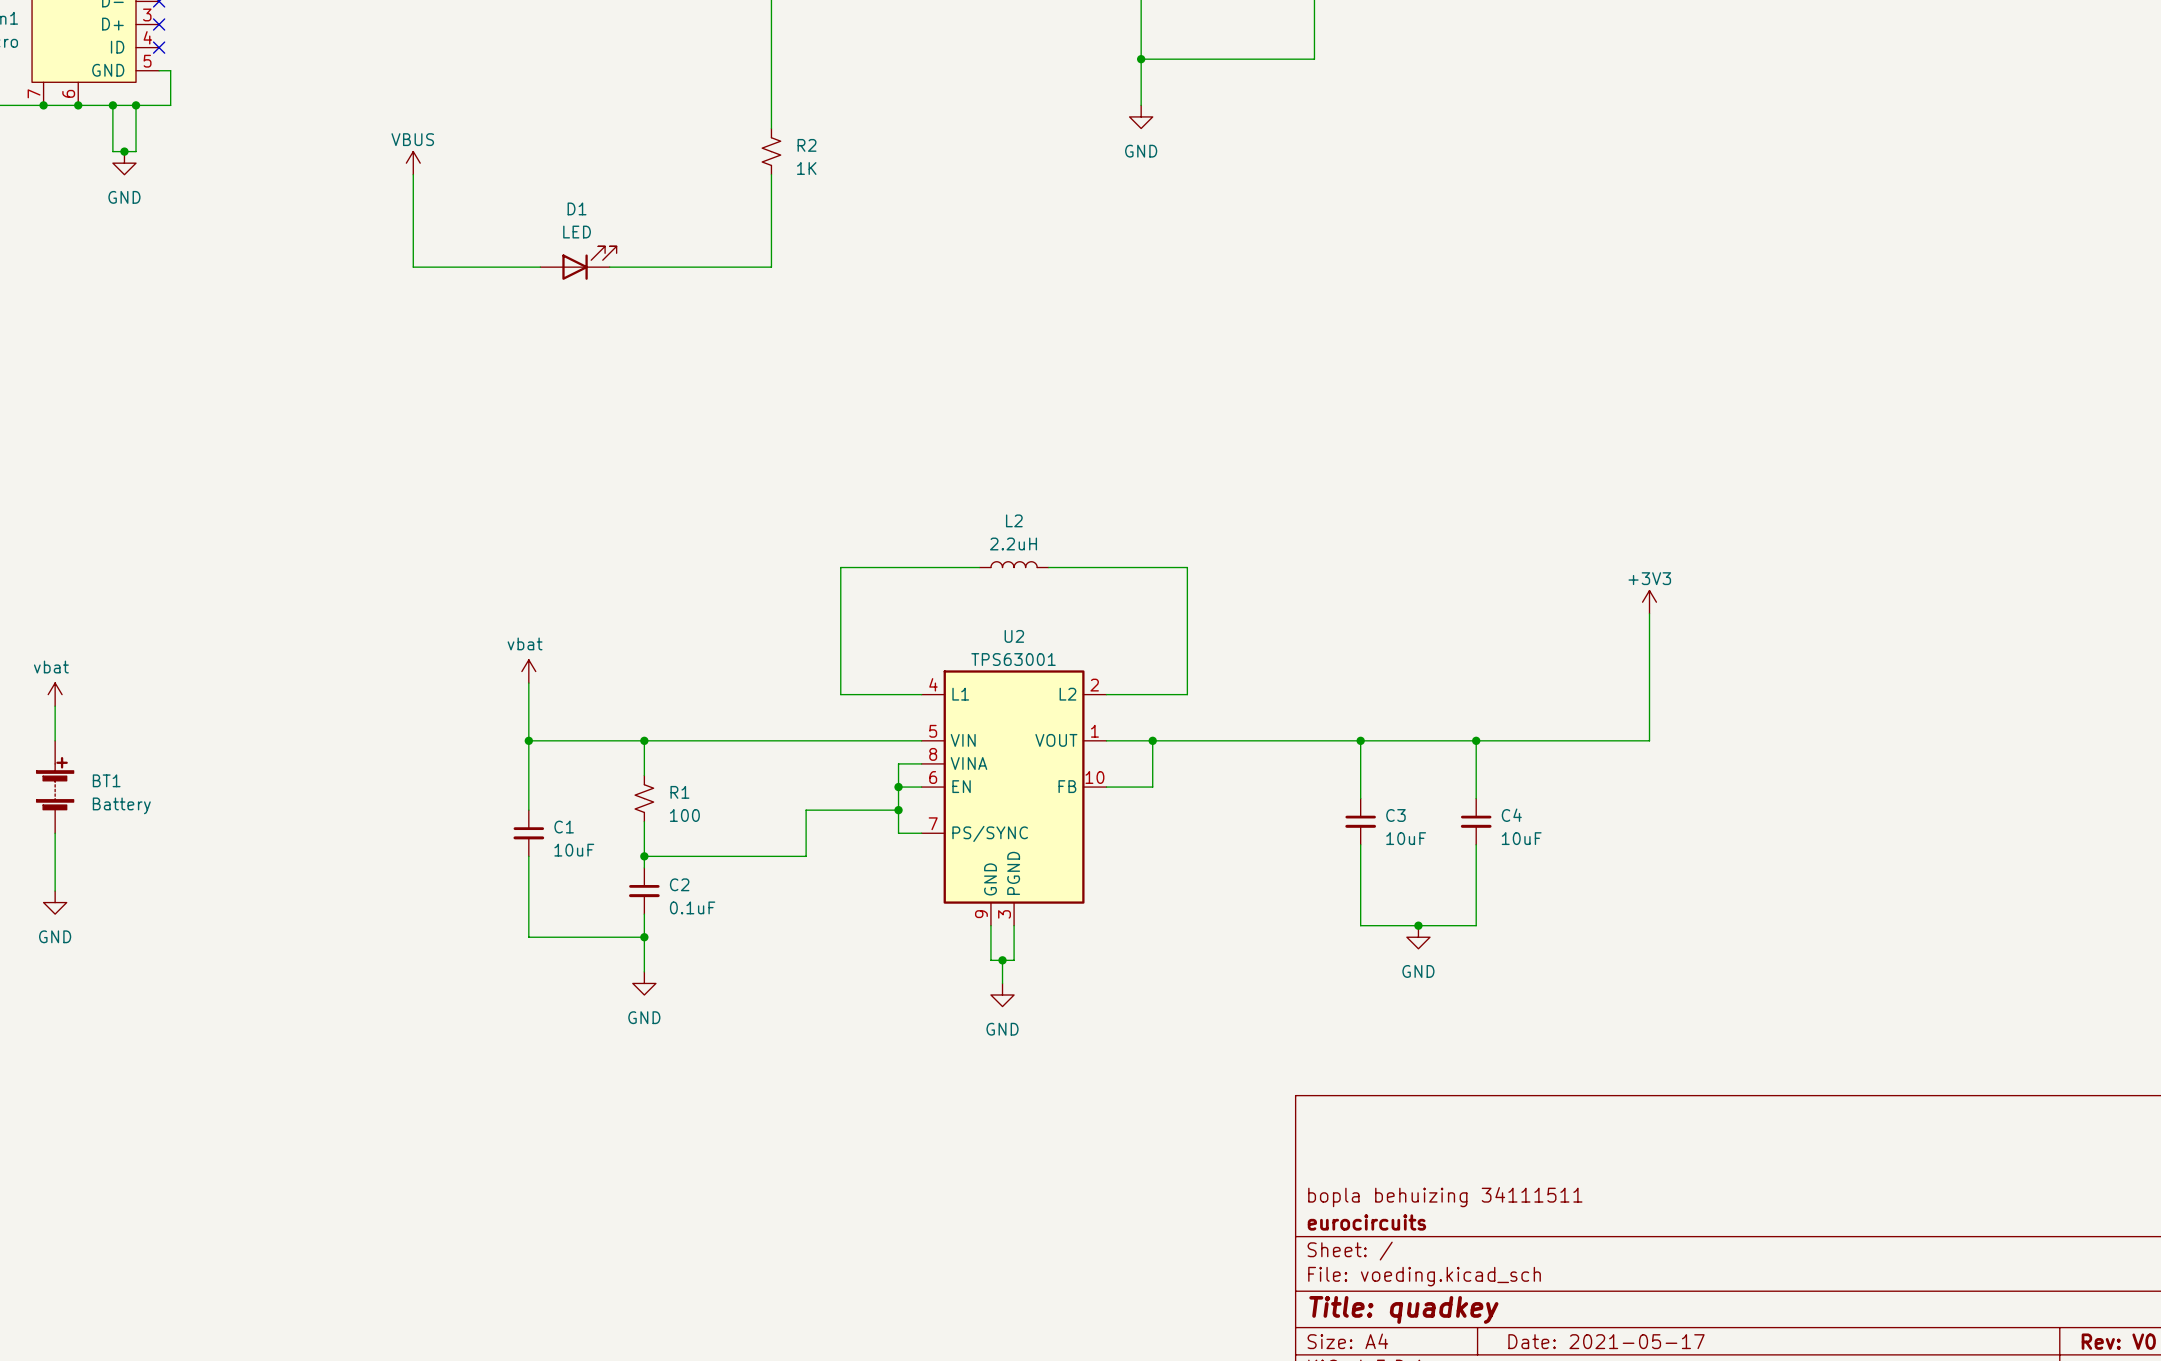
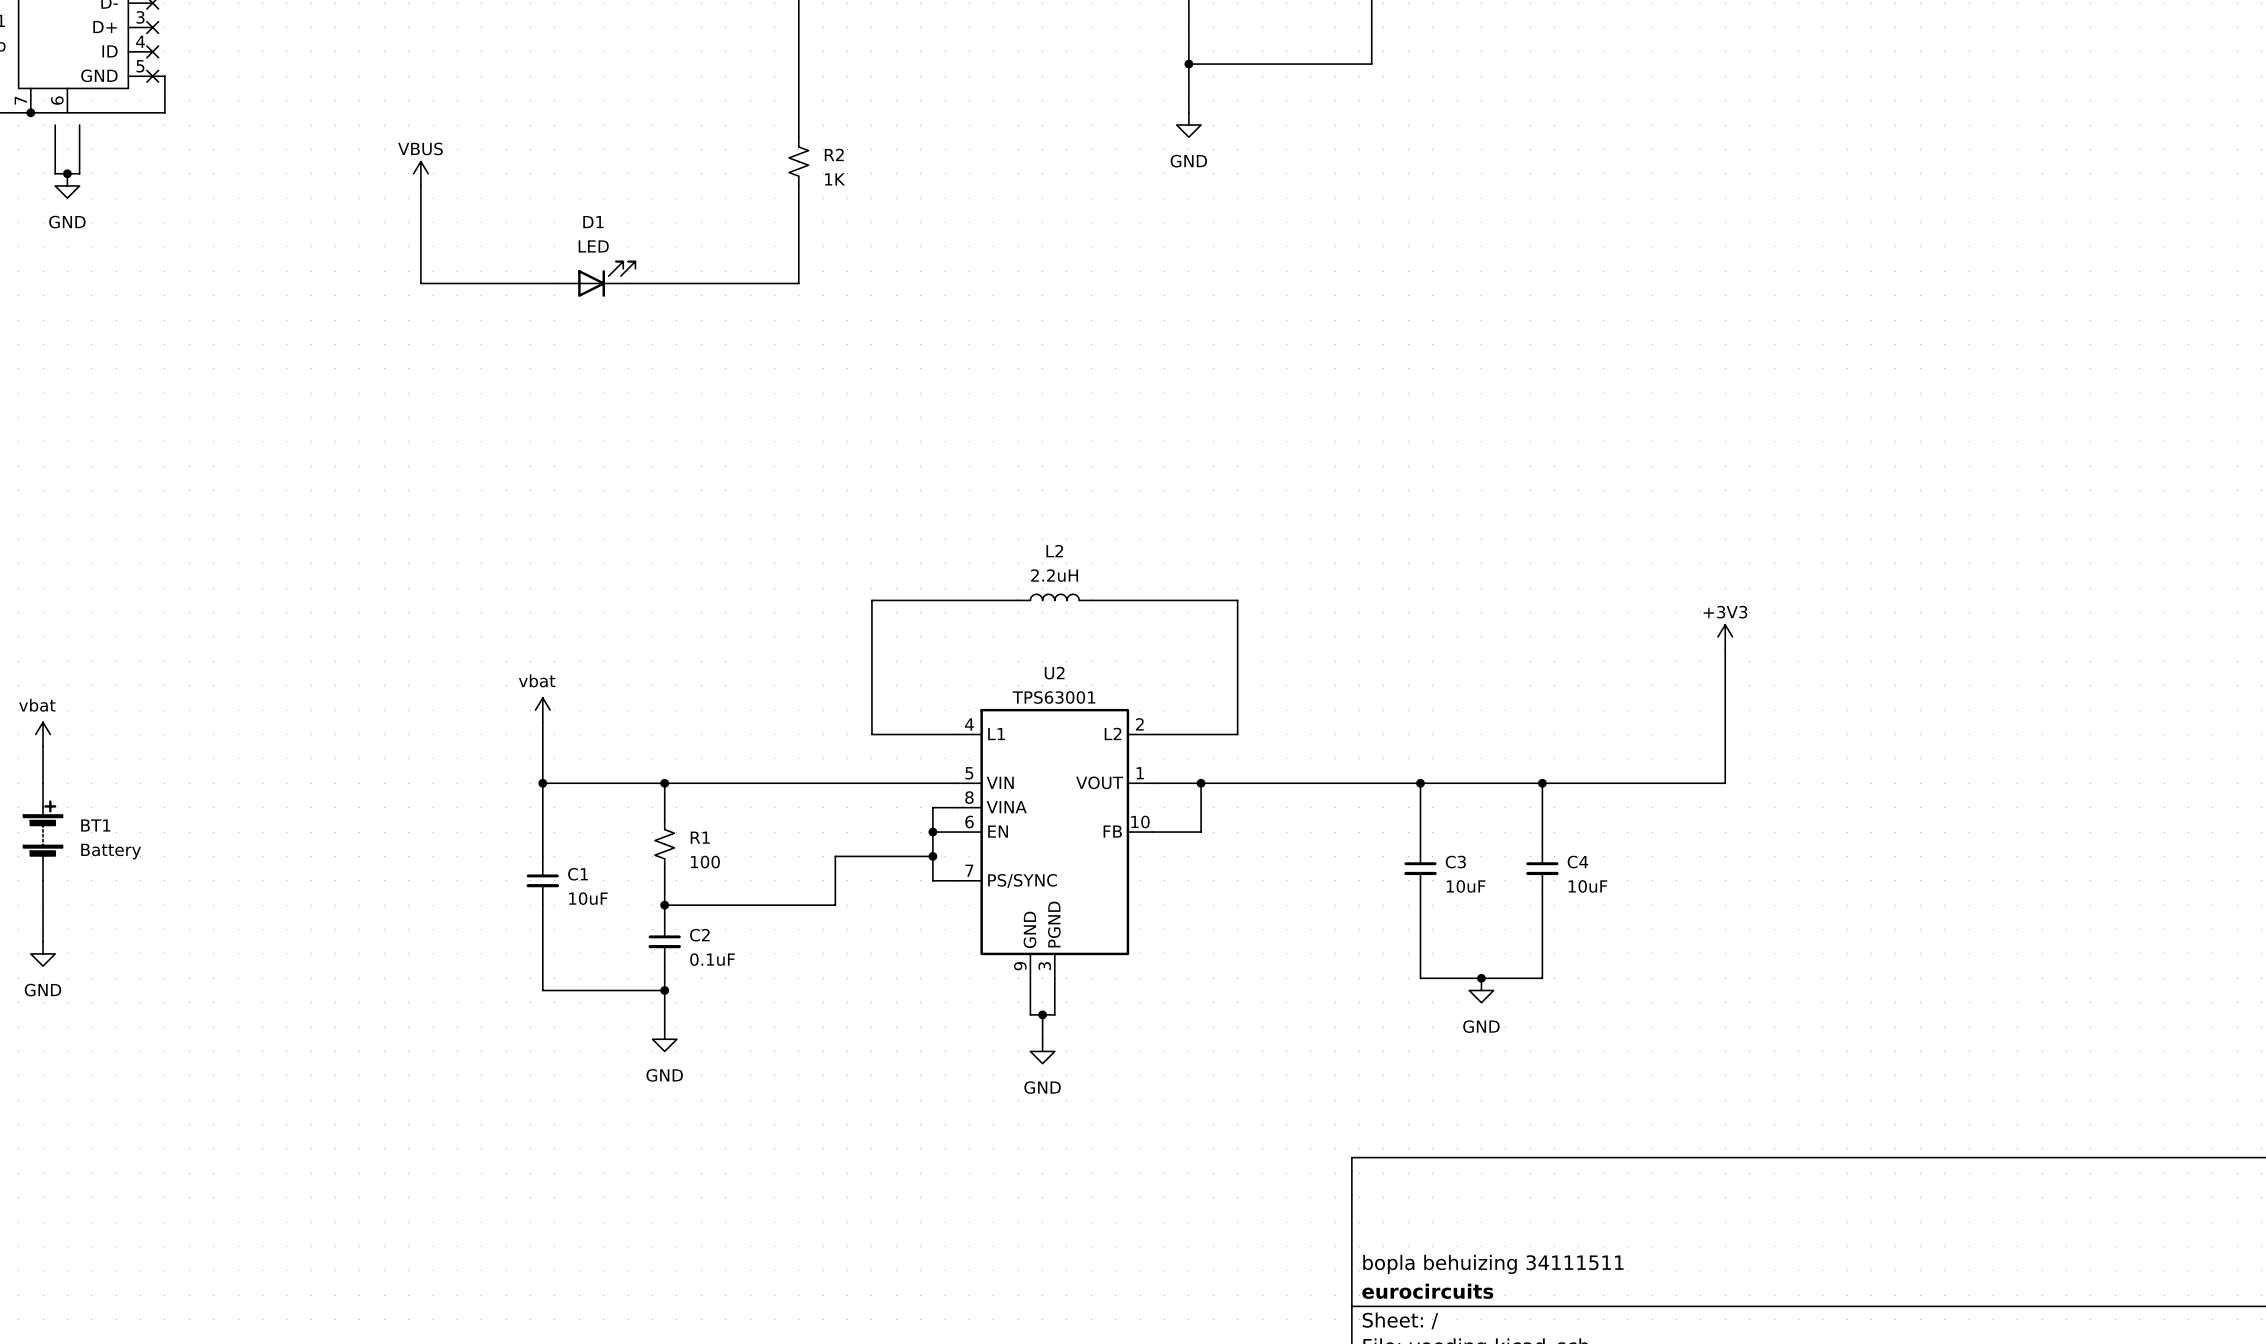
no-connect mark: none -> (152, 76)
junction: (78, 105) -> none
wire: (112, 105) (112, 151) (136, 151) (136, 105) -> (55, 125) (55, 173) (79, 173) (79, 125)
junction: (112, 105) -> none
junction: (136, 105) -> none
junction: (124, 151) -> none
junction: none -> (67, 173)
power symbol position: GND (124, 163) -> GND (67, 185)

